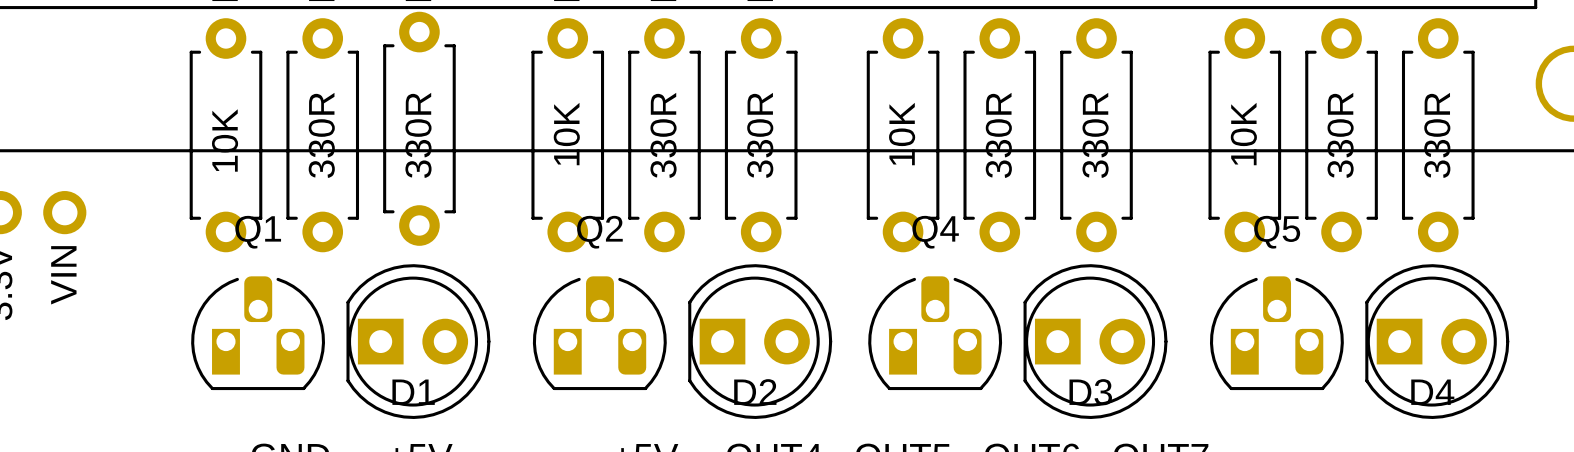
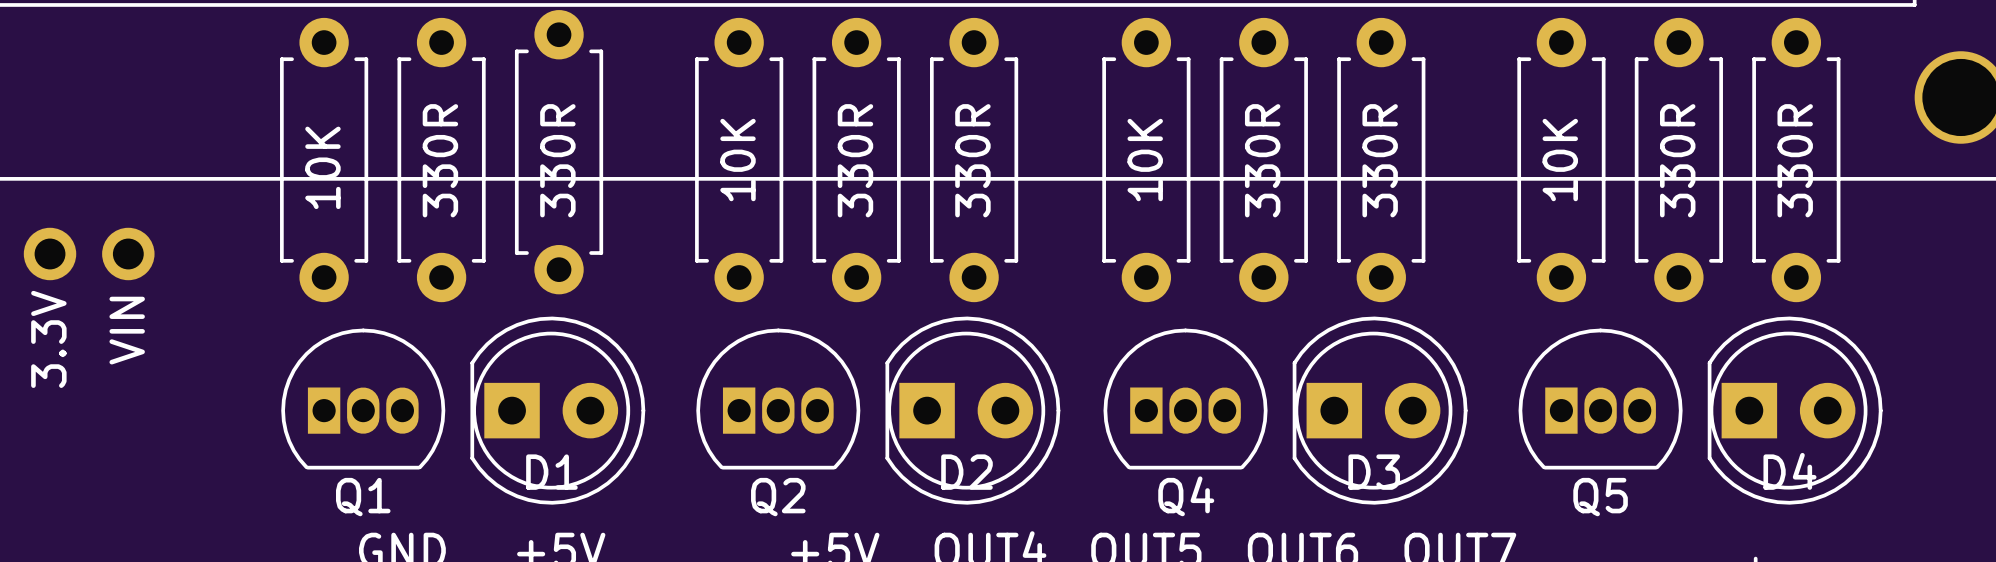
Q1 name position: Q1 (258, 232) -> Q1 (363, 497)
Q2 name position: Q2 (599, 232) -> Q2 (778, 497)
Q4 name position: Q4 (935, 232) -> Q4 (1186, 496)
Q5 name position: Q5 (1277, 232) -> Q5 (1600, 497)
Q1 footprint: [191, 276, 326, 391] -> [281, 328, 446, 470]
Q2 footprint: [532, 276, 667, 391] -> [696, 328, 861, 470]
Q4 footprint: [868, 276, 1003, 391] -> [1103, 328, 1268, 470]
Q5 footprint: [1209, 276, 1344, 391] -> [1518, 328, 1683, 470]

